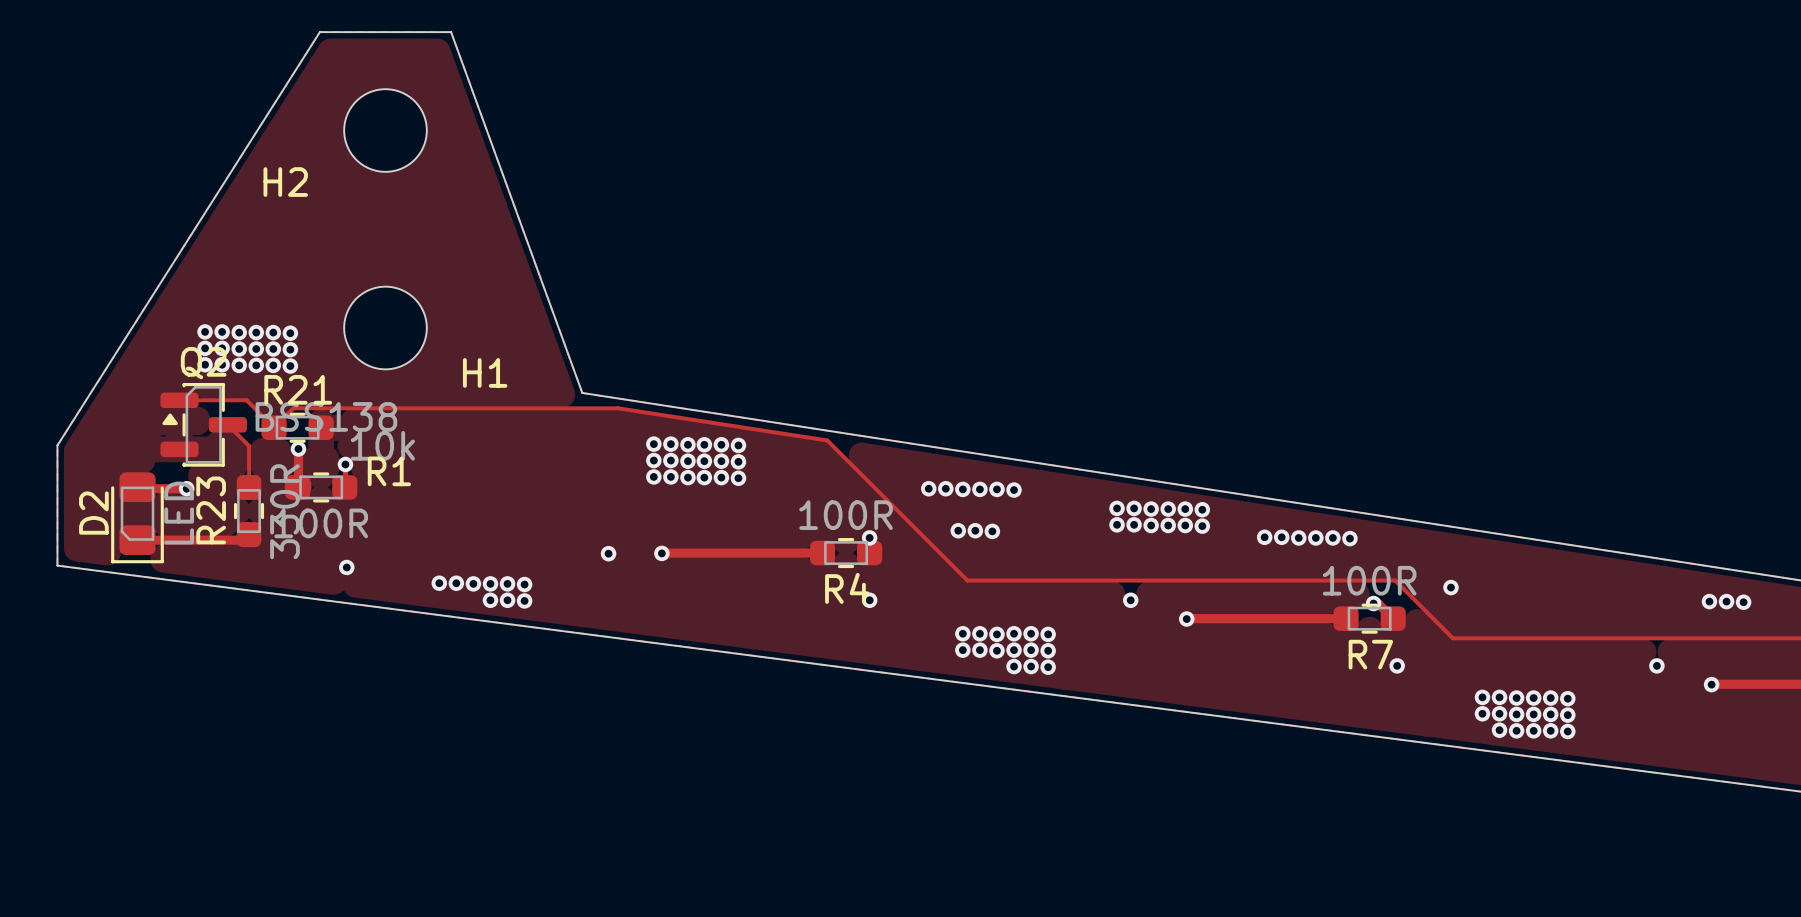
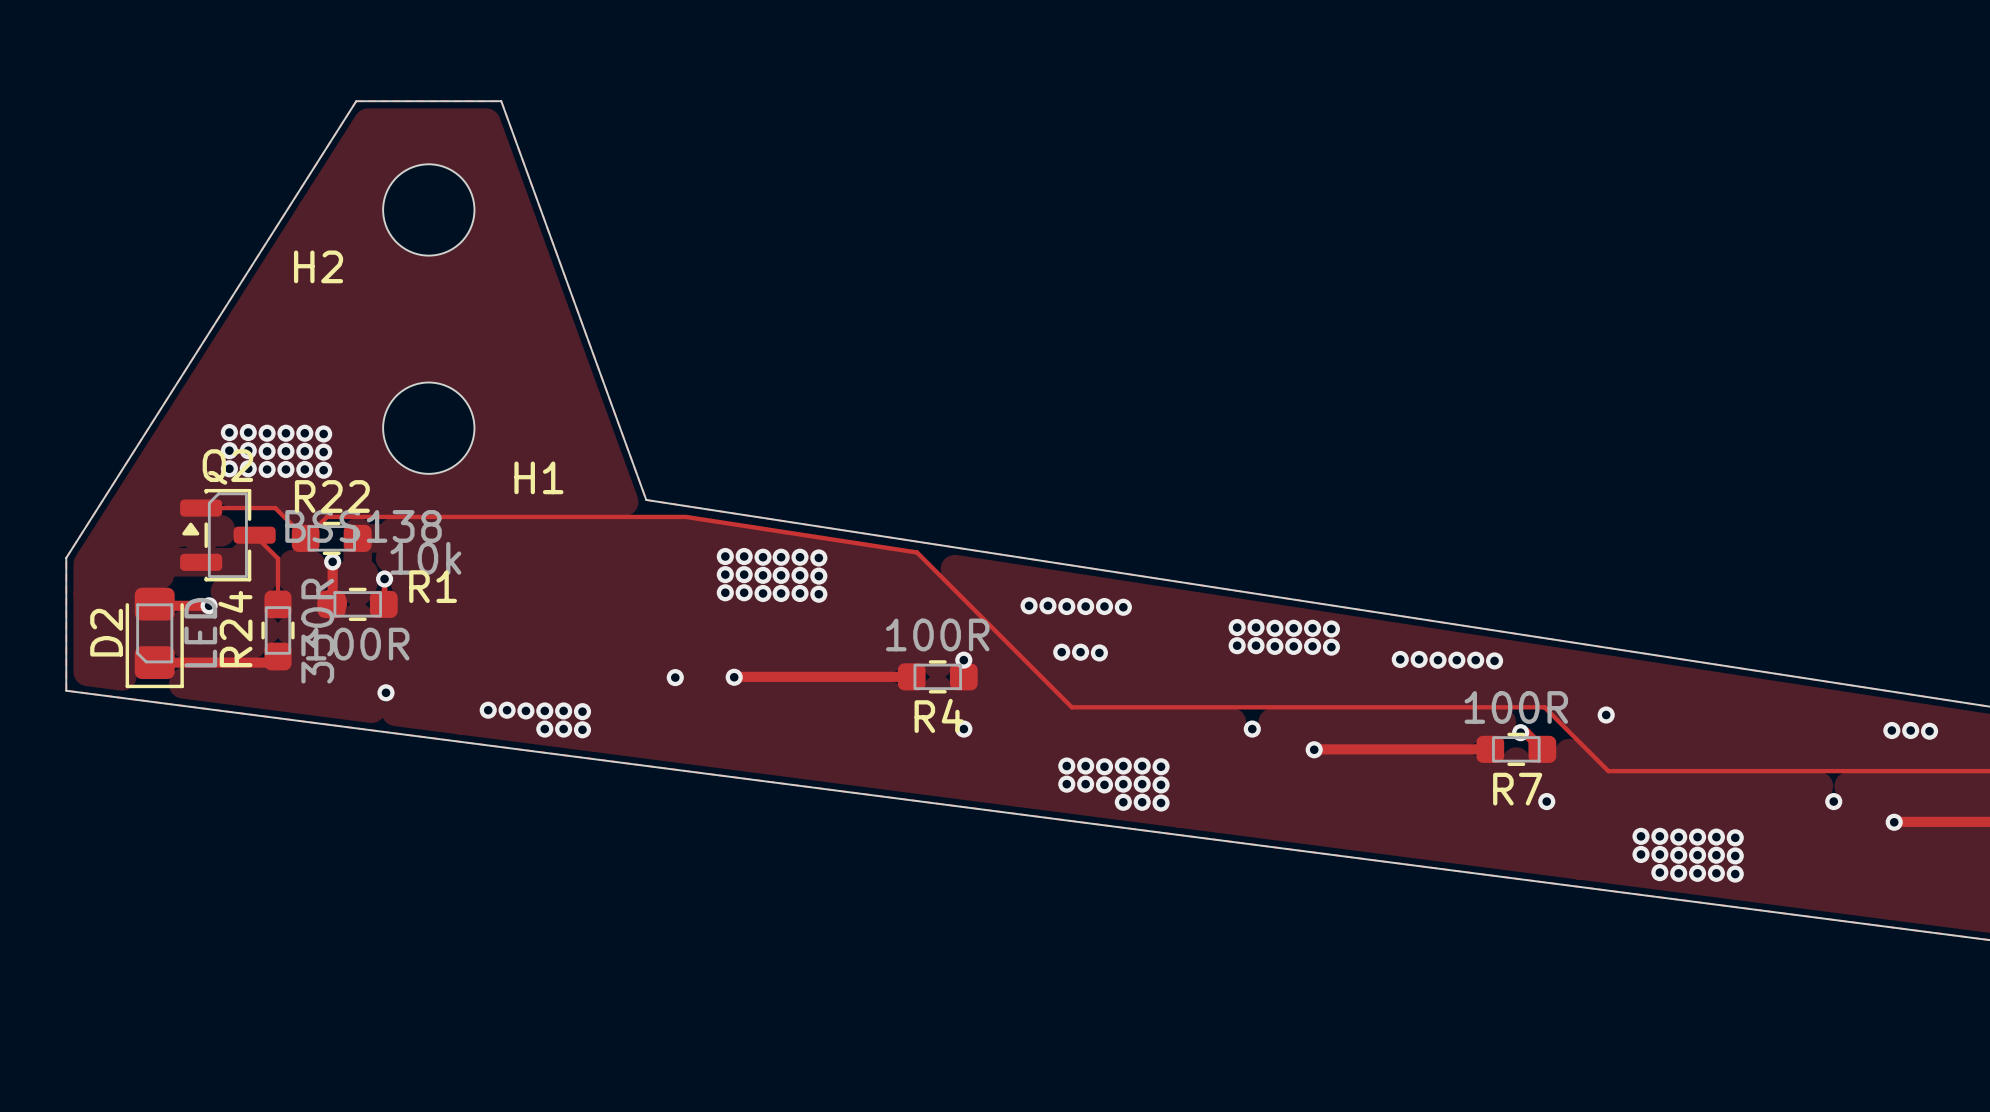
R21 name: R21 (298, 389) -> R22 (332, 496)
R23 name: R23 (211, 510) -> R24 (235, 629)

